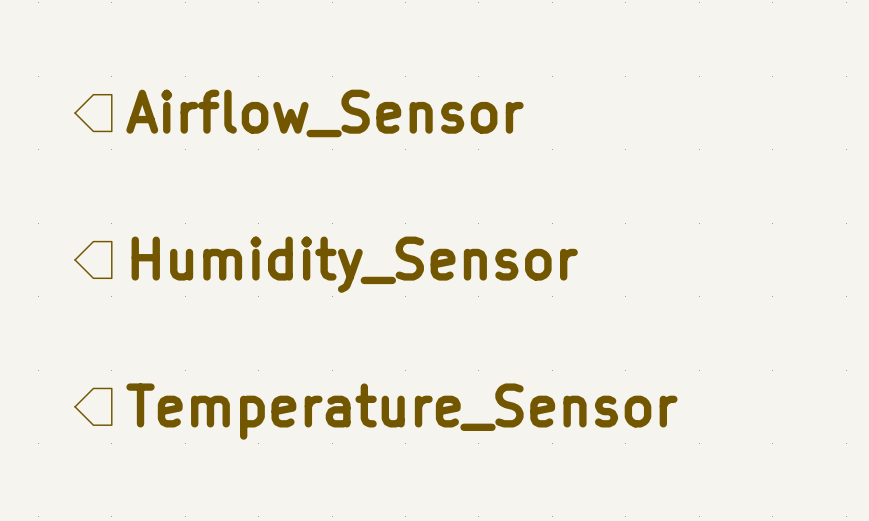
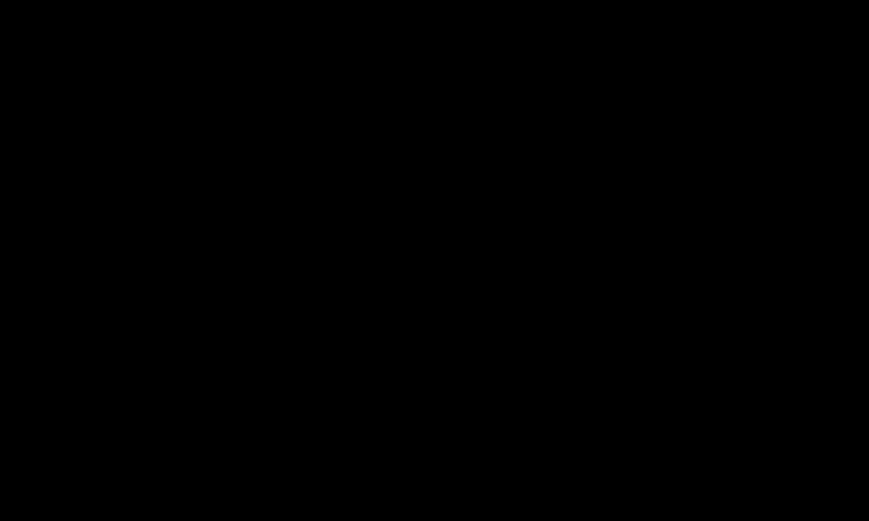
hierarchical label: Airflow_Sensor (324, 113) -> none
hierarchical label: Humidity_Sensor (354, 264) -> none
hierarchical label: Temperature_Sensor (401, 411) -> none

